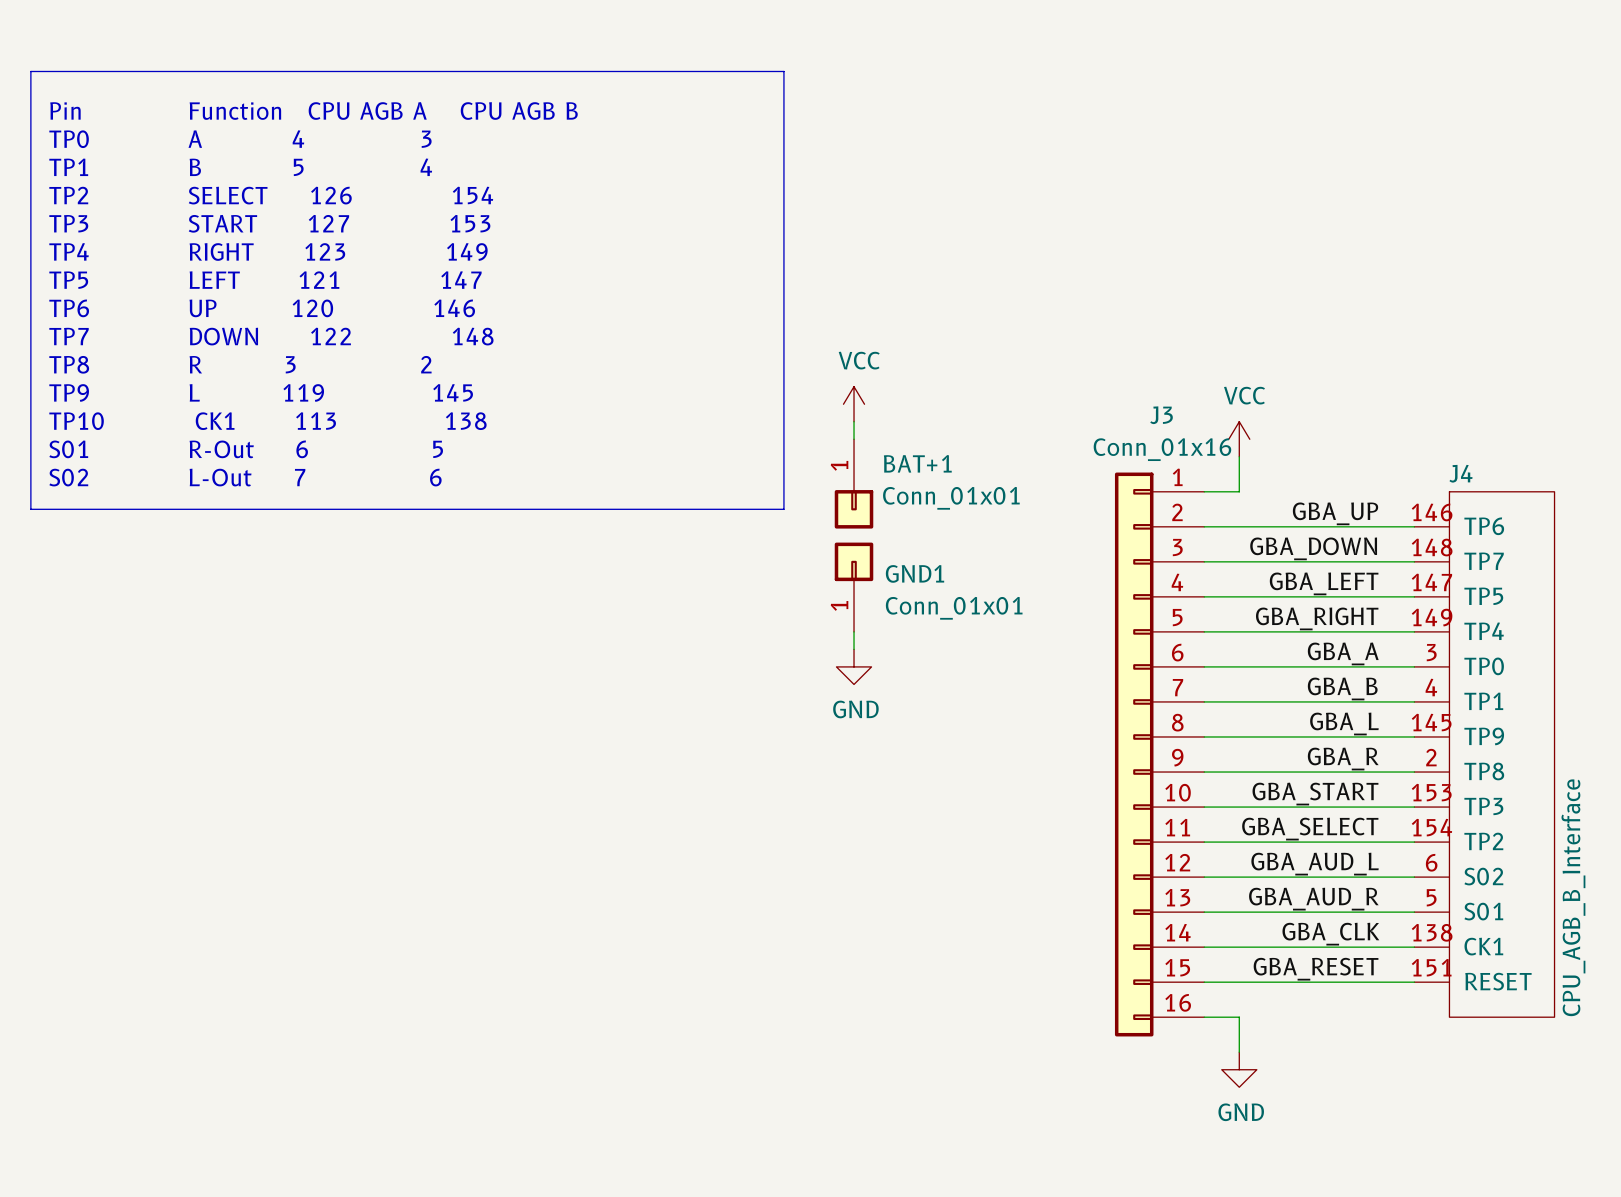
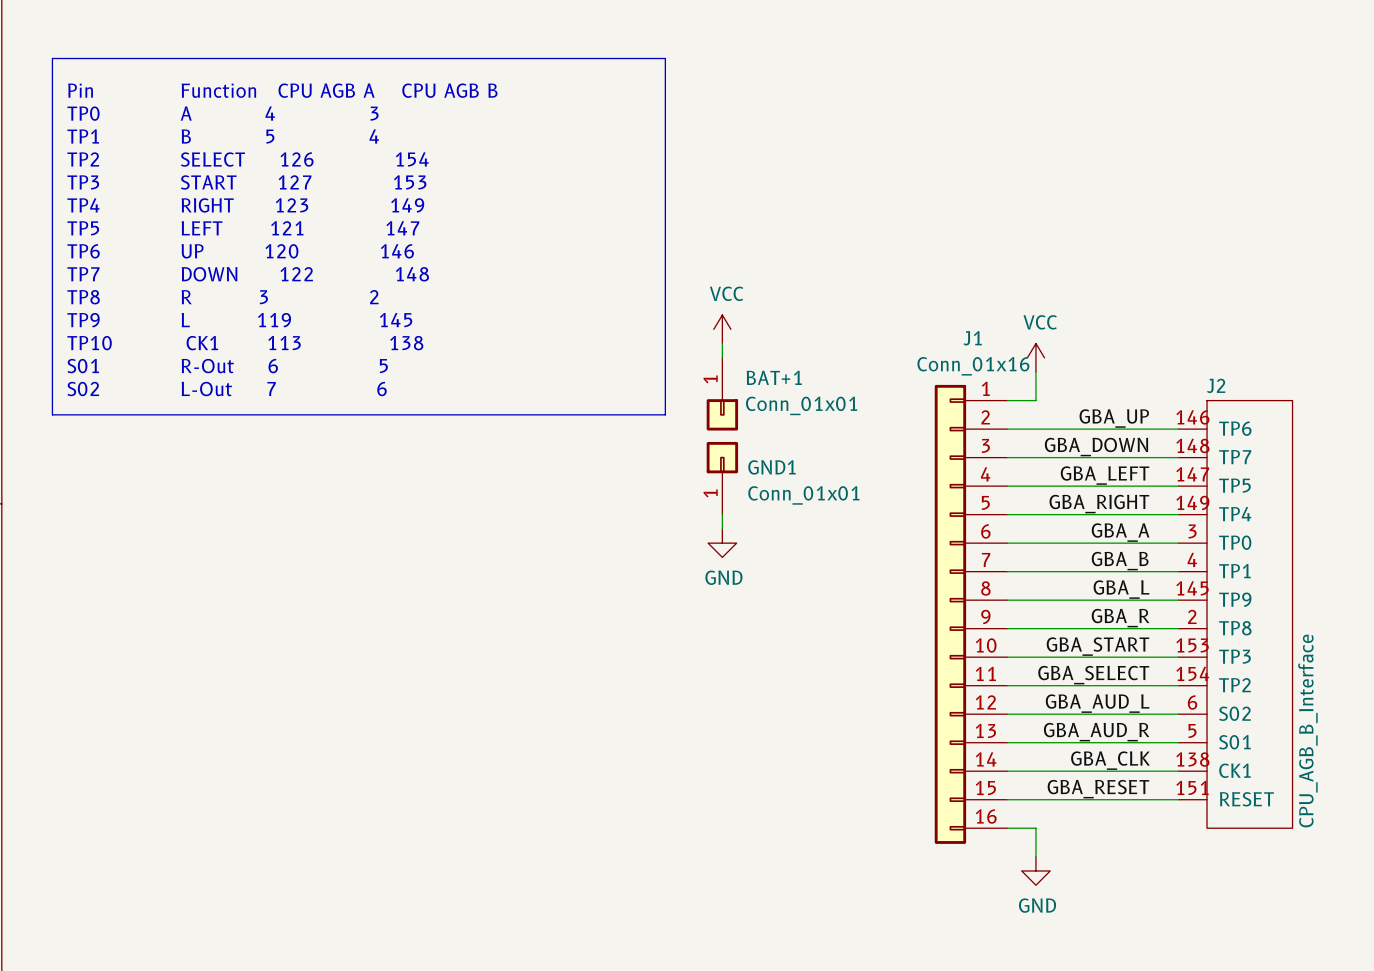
J3 name: J3 (1161, 415) -> J1 (972, 338)
J4 name: J4 (1460, 473) -> J2 (1216, 385)

